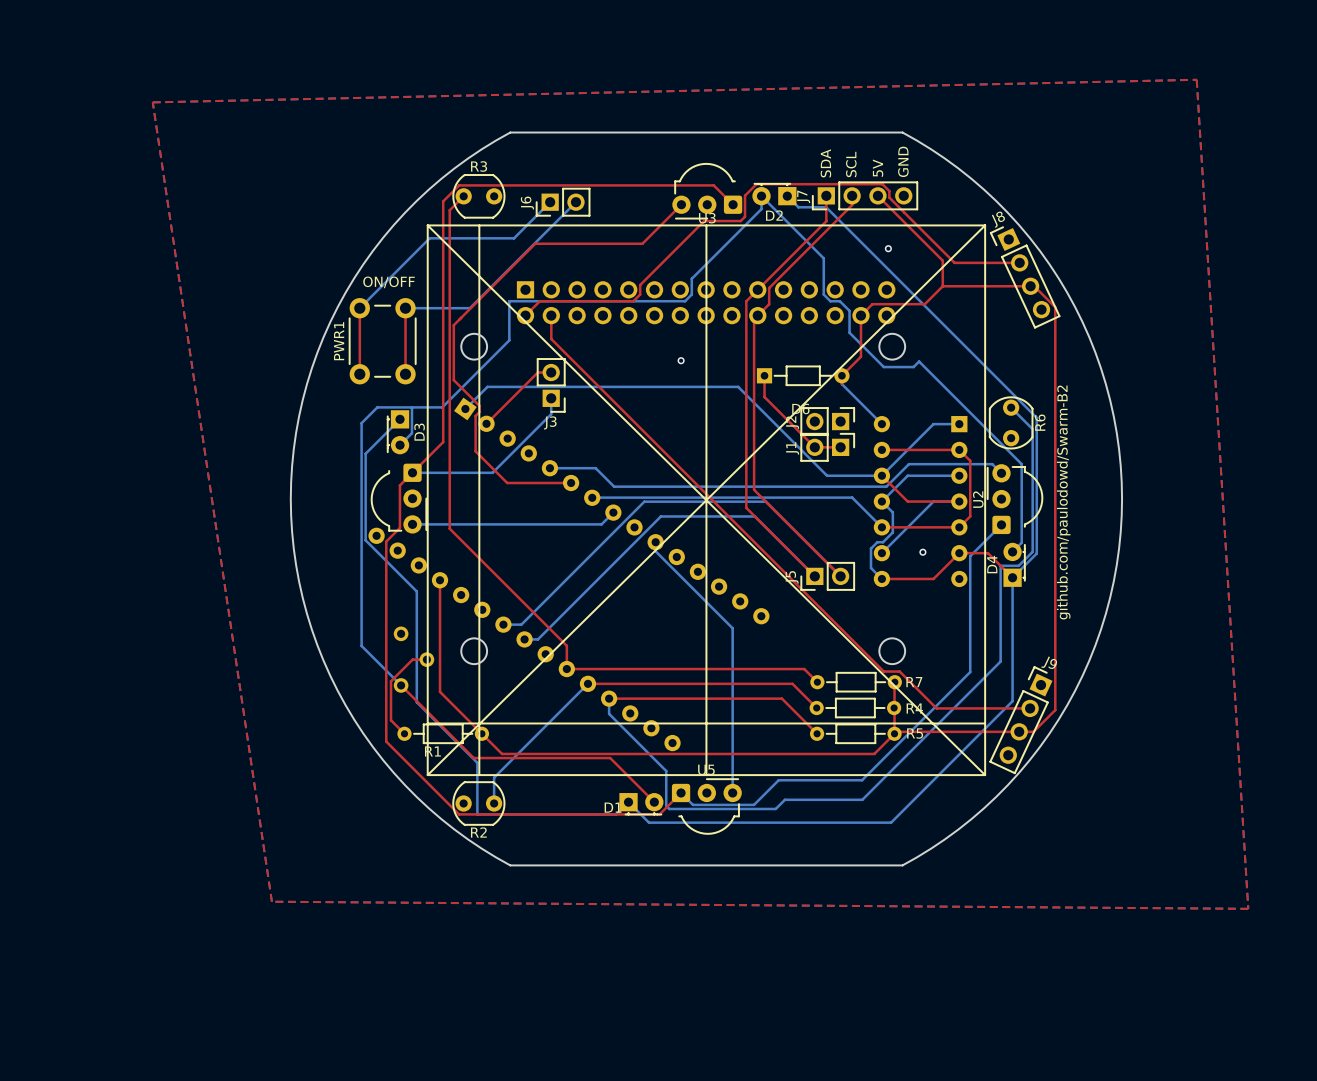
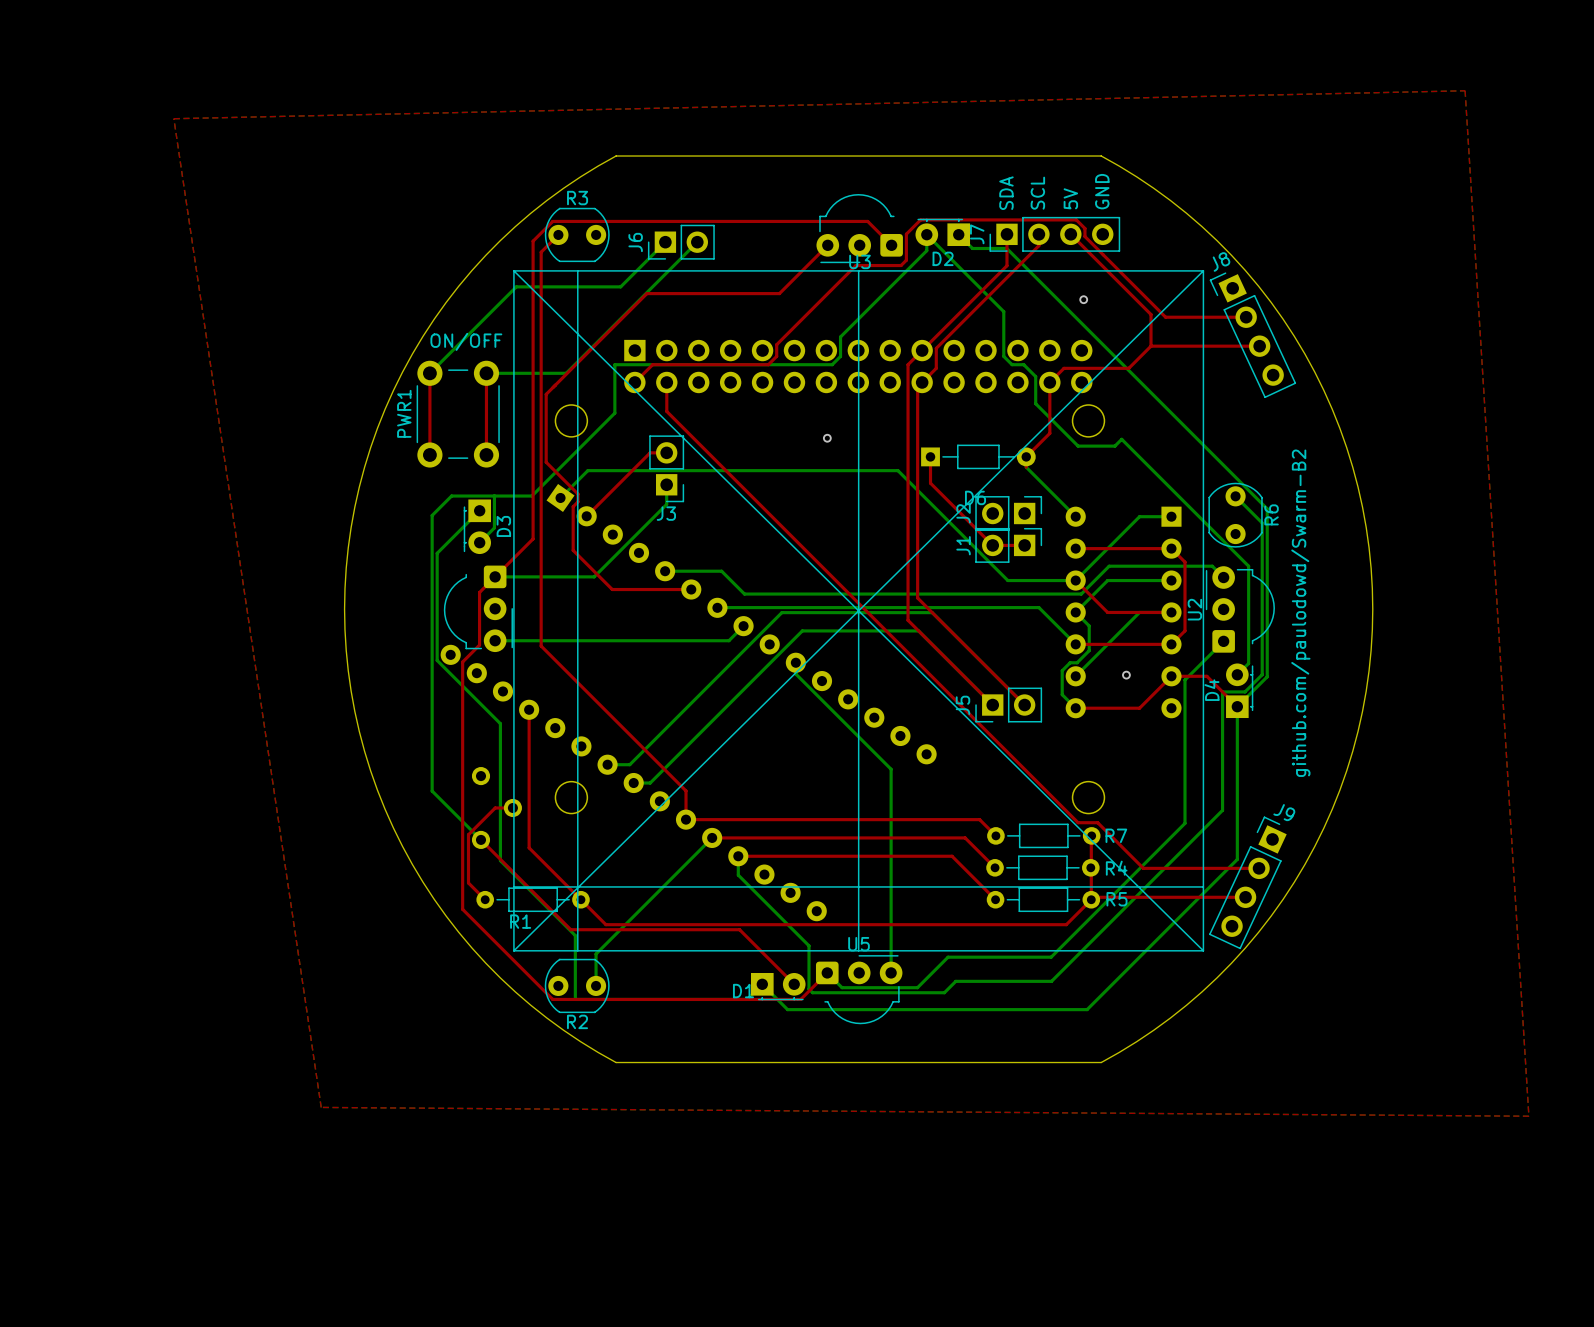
top track: (1030, 286) (1034, 286) (1055, 307) (1055, 710) (1033, 731) (1019, 731) -> none

